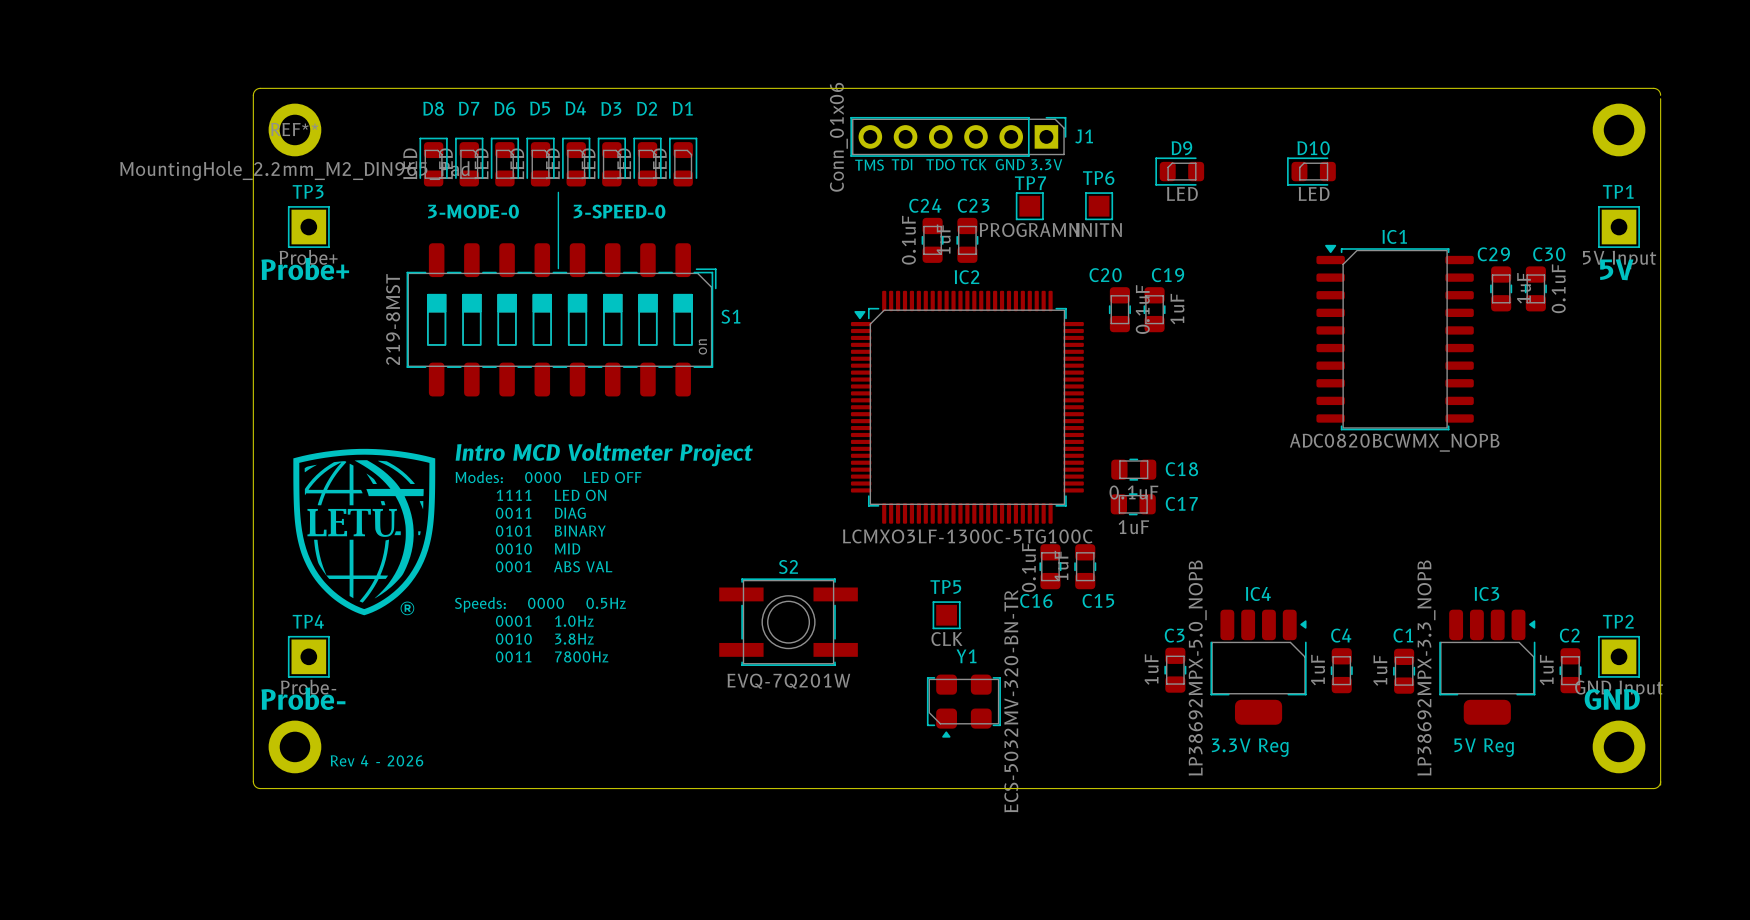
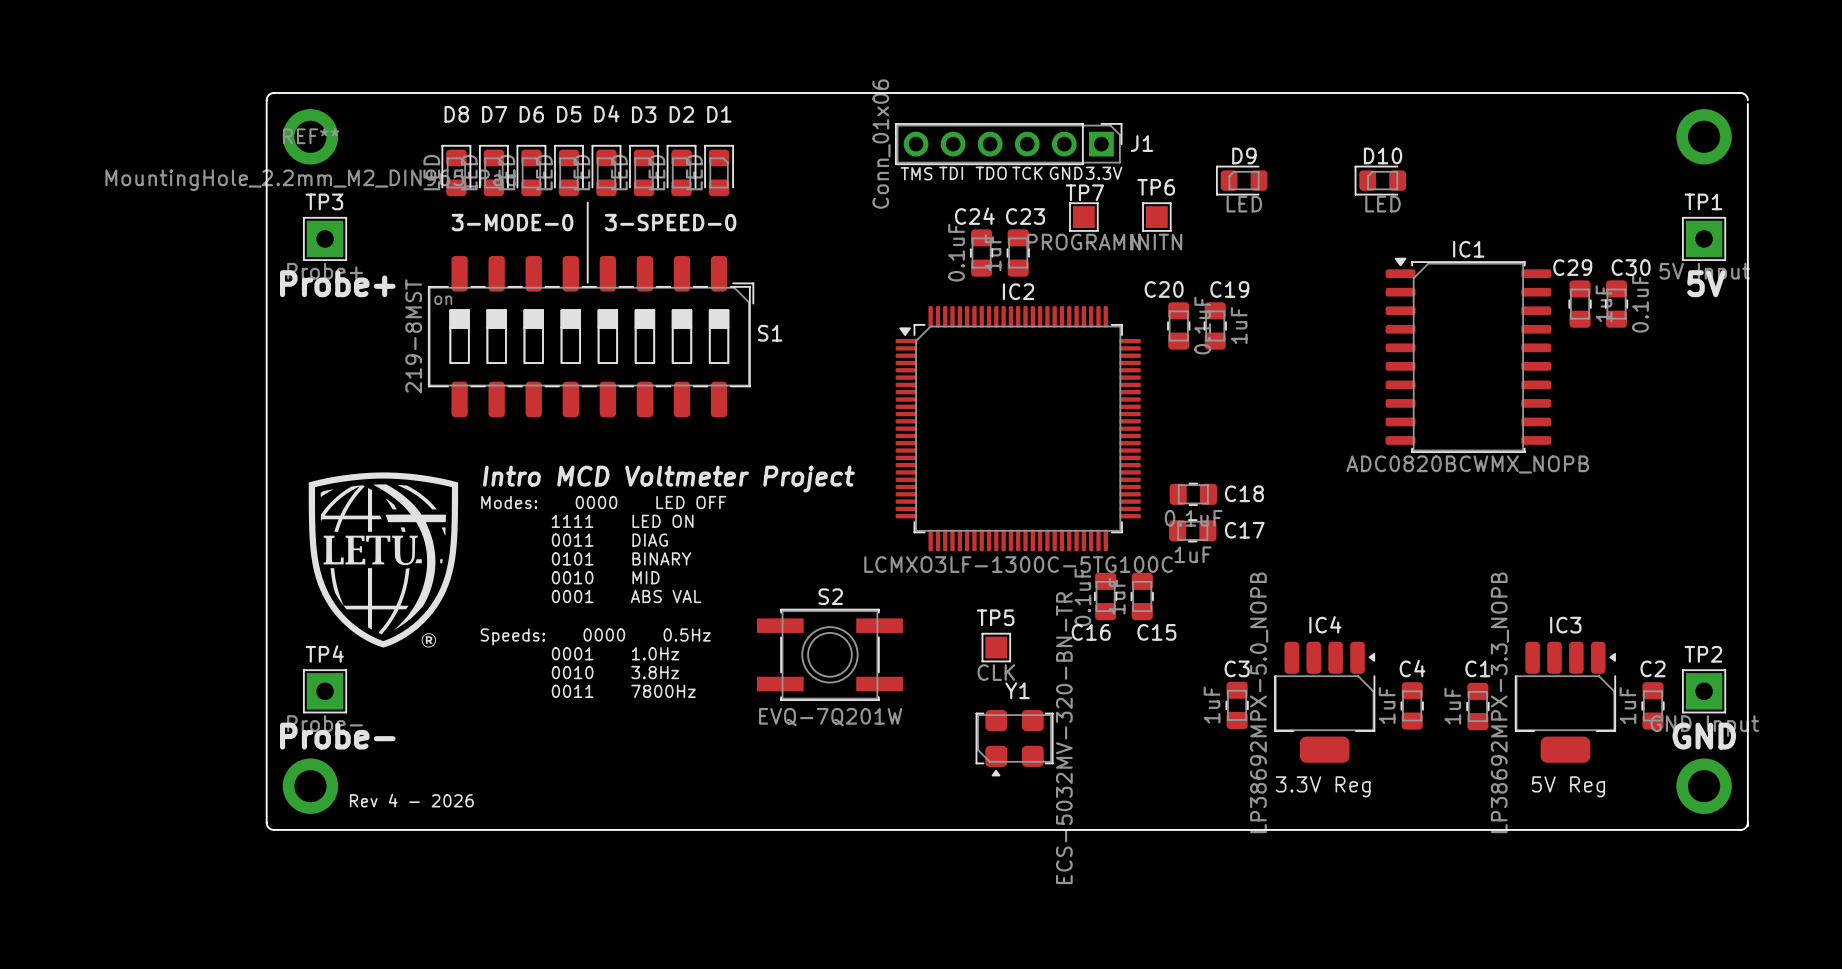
S1 text rotation: 0° (702, 346) -> 90° clockwise (443, 300)
S1 text position: on (702, 346) -> on (443, 300)

